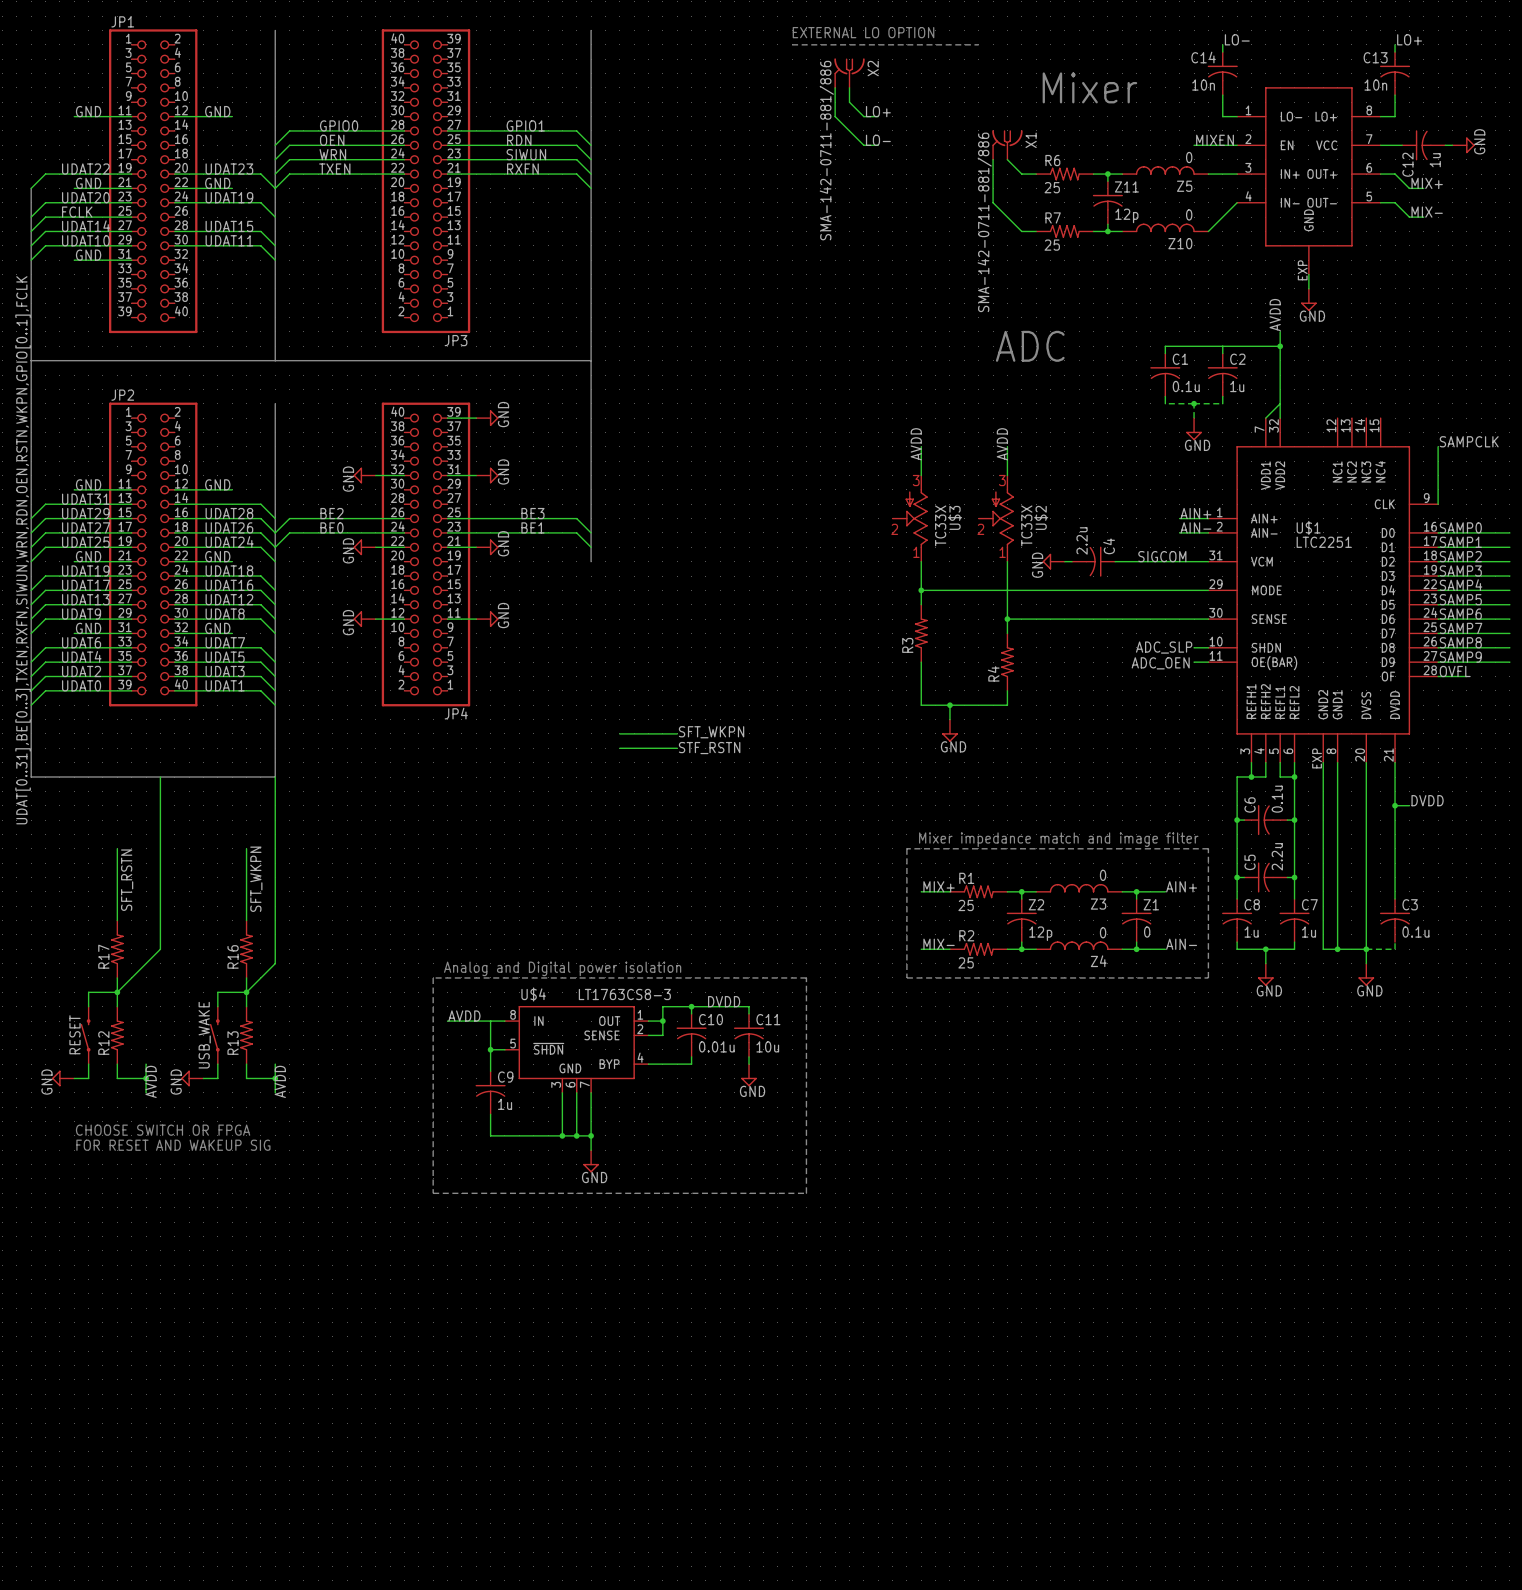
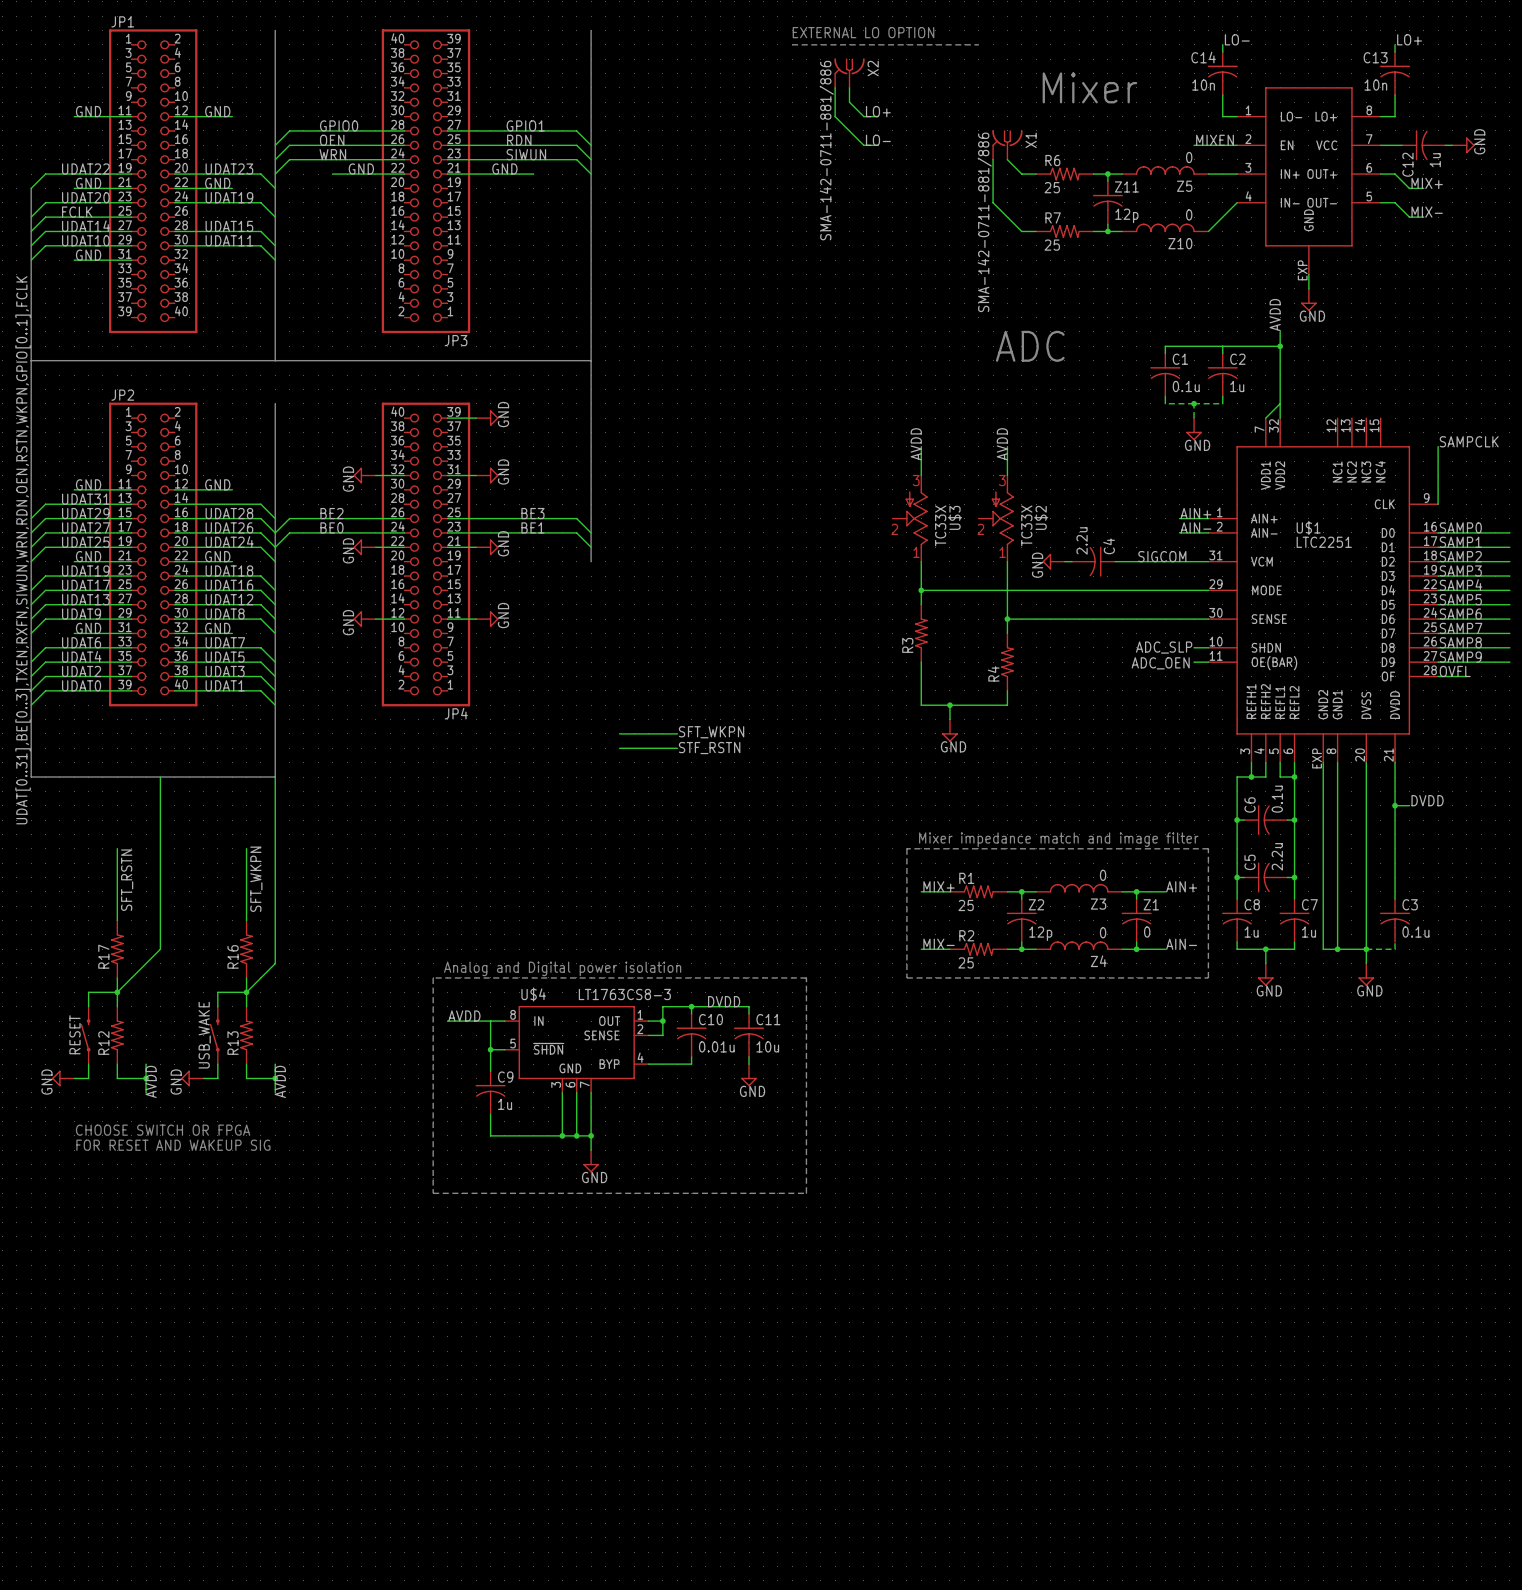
label: TXEN (334, 169) -> none
label: none -> GND (361, 169)
label: none -> GND (504, 169)
label: RXFN (522, 169) -> none
wire: (332, 174) (289, 174) (275, 188) -> none
wire: (533, 174) (576, 174) (591, 188) -> none

